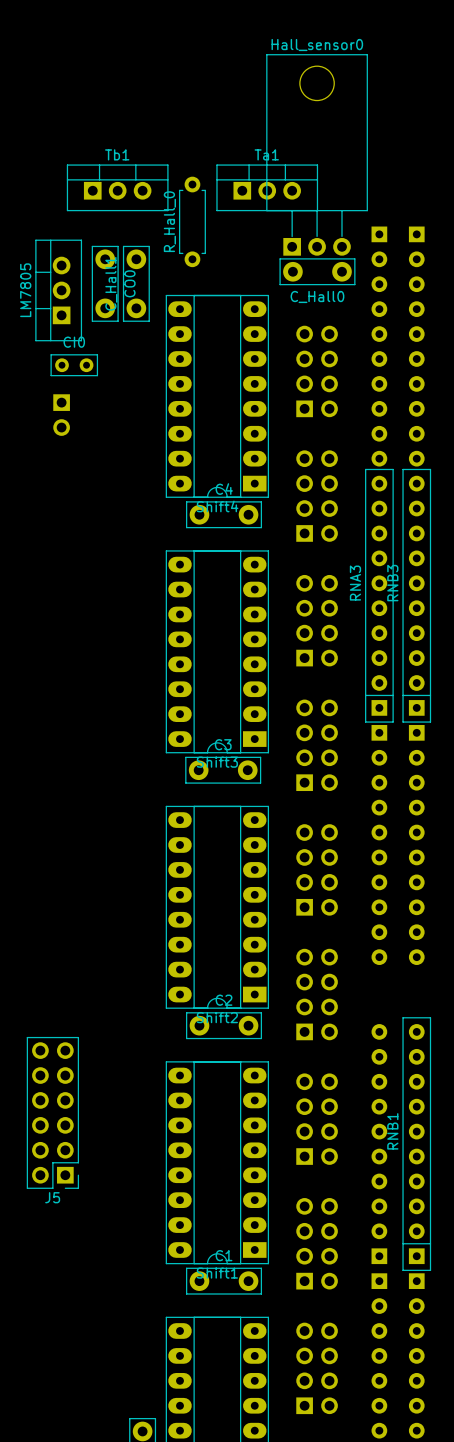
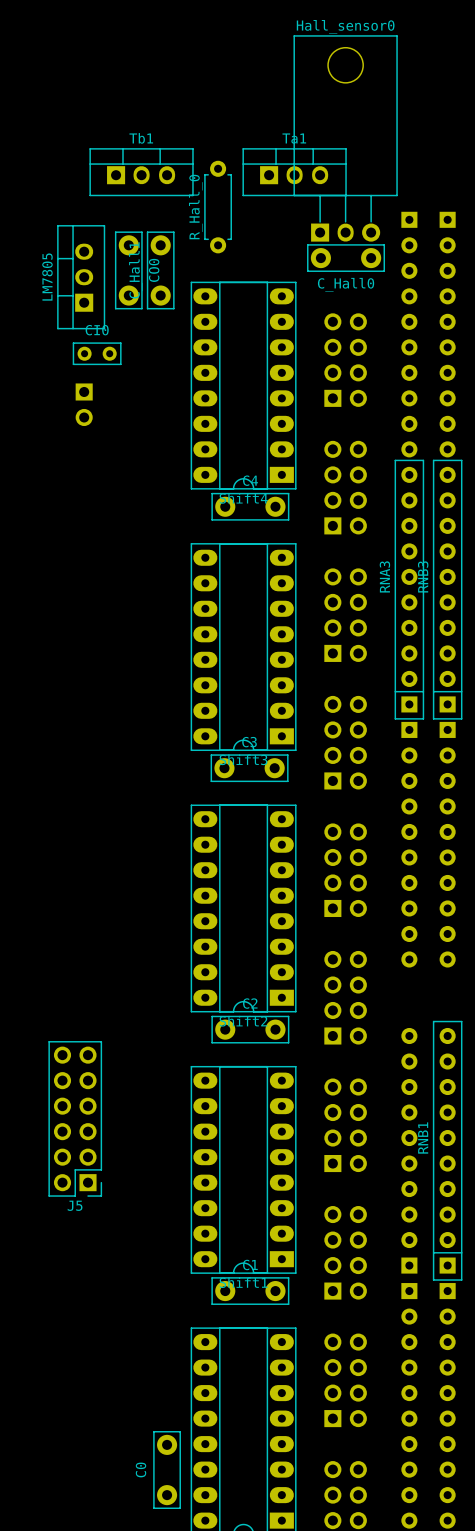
Hall_sensor0 footprint: [266, 54, 368, 256] -> [293, 35, 398, 242]
Tb1 footprint: [66, 164, 169, 212] -> [89, 148, 194, 197]
Ta1 footprint: [216, 164, 319, 212] -> [242, 148, 347, 197]
LM7805 footprint: [35, 239, 83, 342] -> [57, 225, 106, 330]

